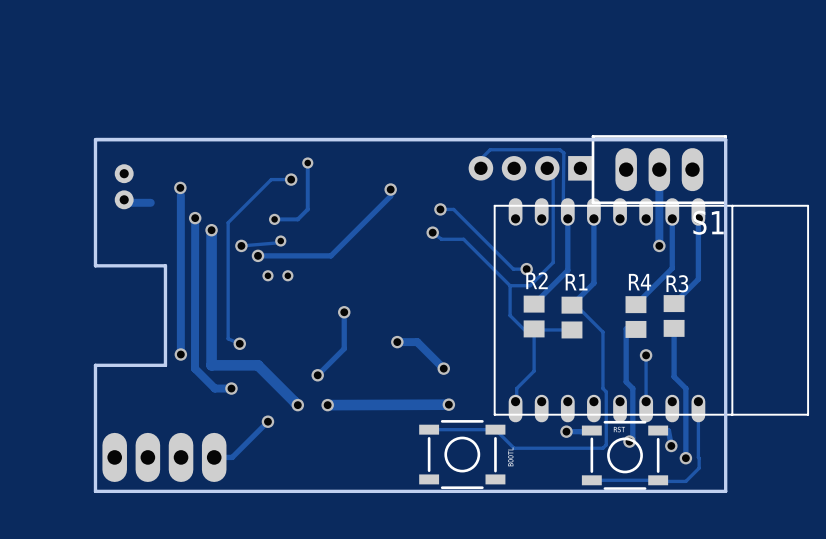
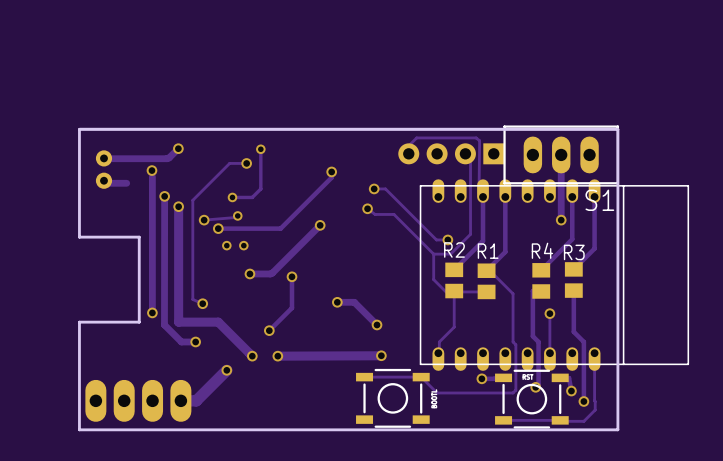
track: none -> (178, 148) (167, 158) (104, 158)
via: none -> (178, 148)
track: none -> (320, 225) (272, 273) (249, 273)
via: none -> (320, 225)
via: none -> (249, 273)
track width: thin (267, 421) (232, 457) (214, 457) -> thick (226, 370) (196, 400) (180, 400)

